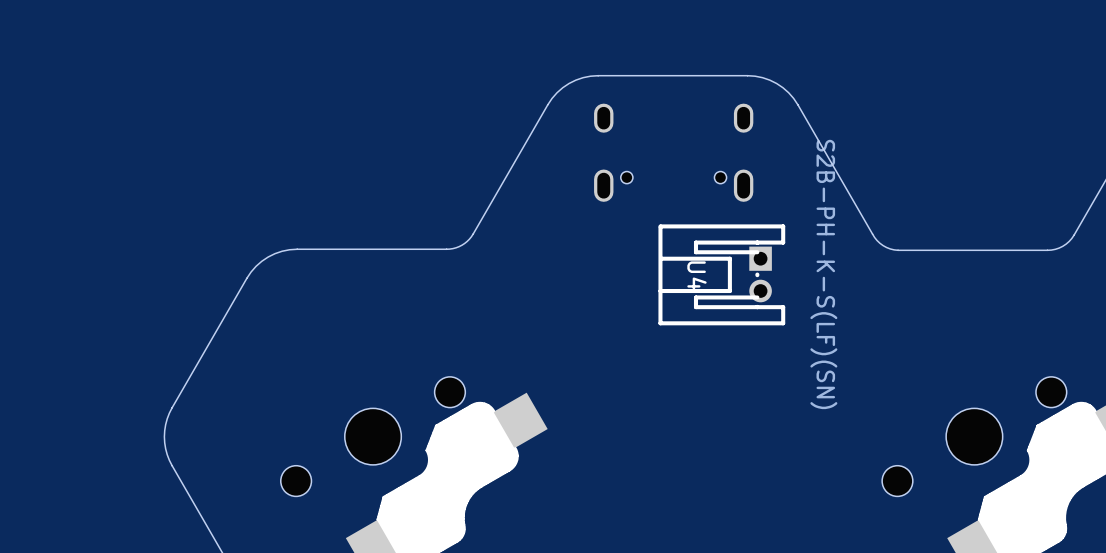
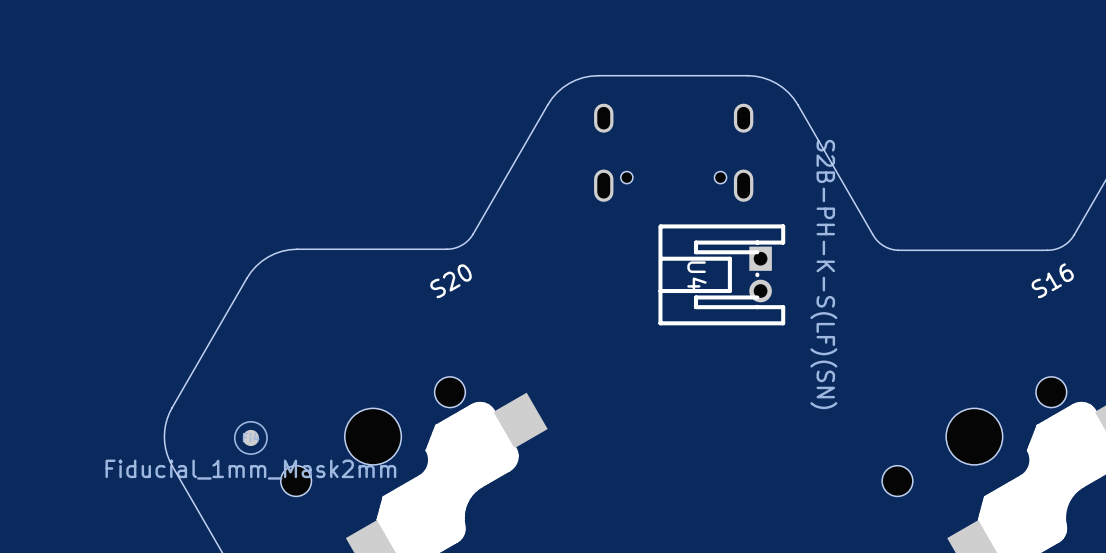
S16 name: none -> S16 (1052, 280)
S20 name: none -> S20 (451, 281)
part: none -> Fiducial_1mm_Mask2mm (250, 437)

